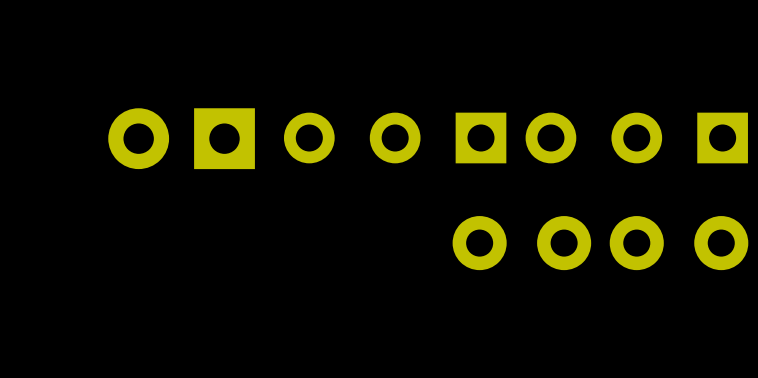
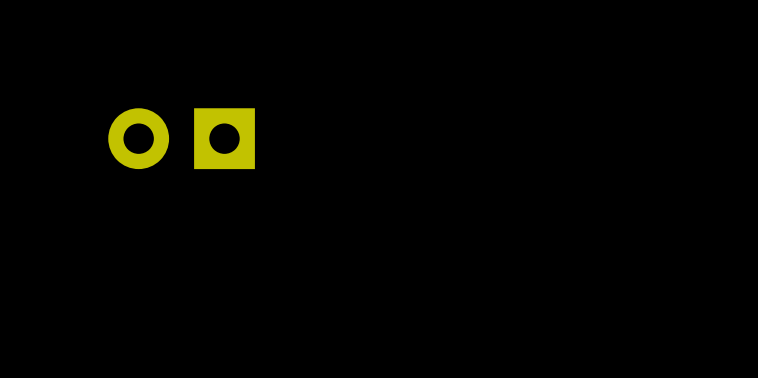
part: (395, 137) -> none
part: (636, 137) -> none
part: (521, 243) -> none
part: (679, 243) -> none

